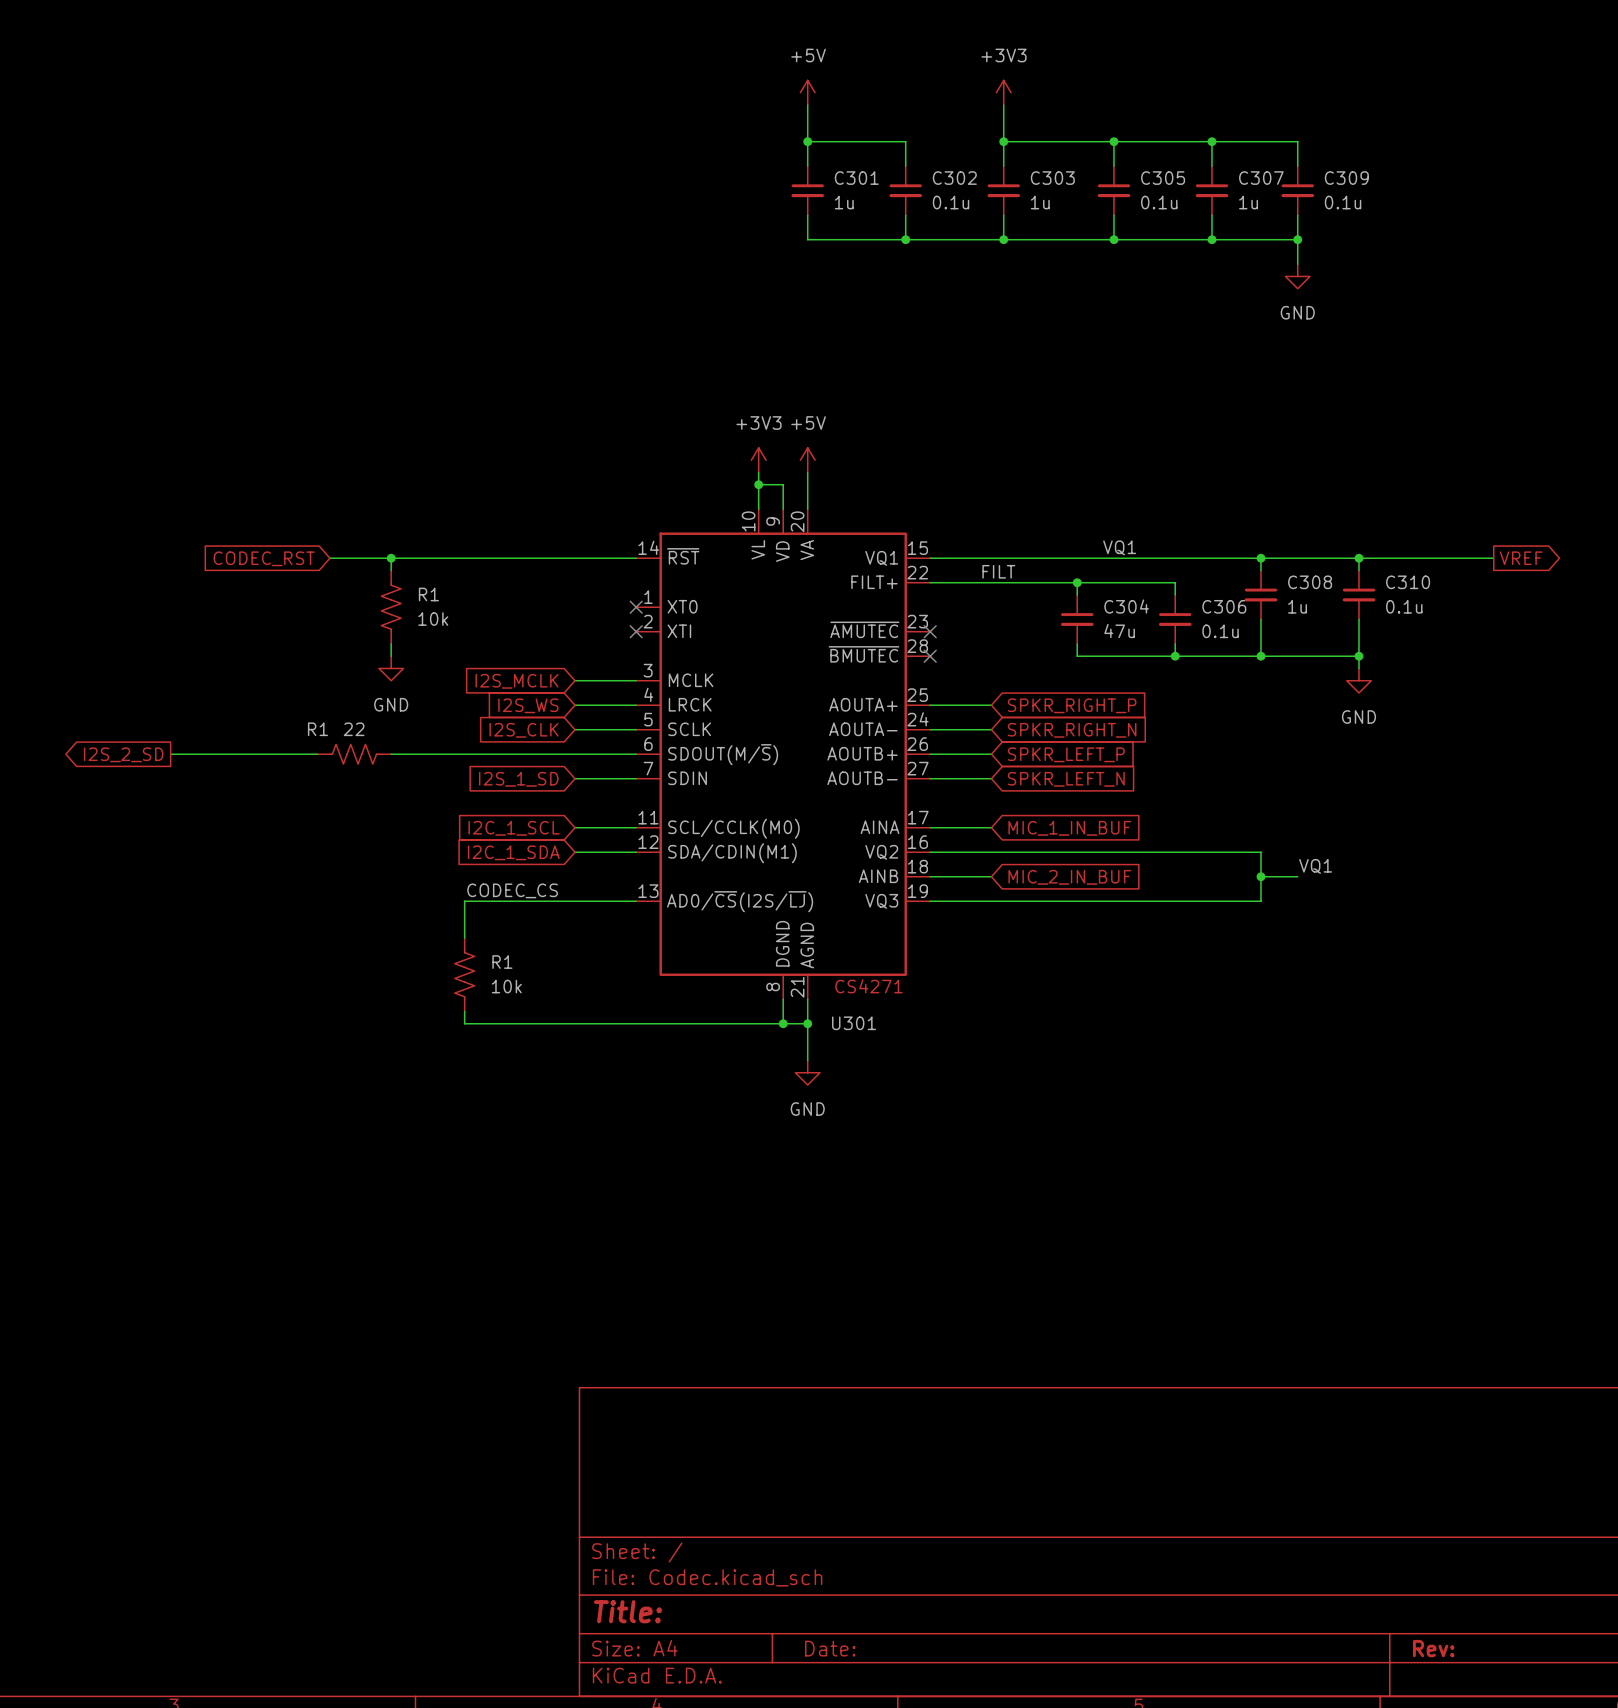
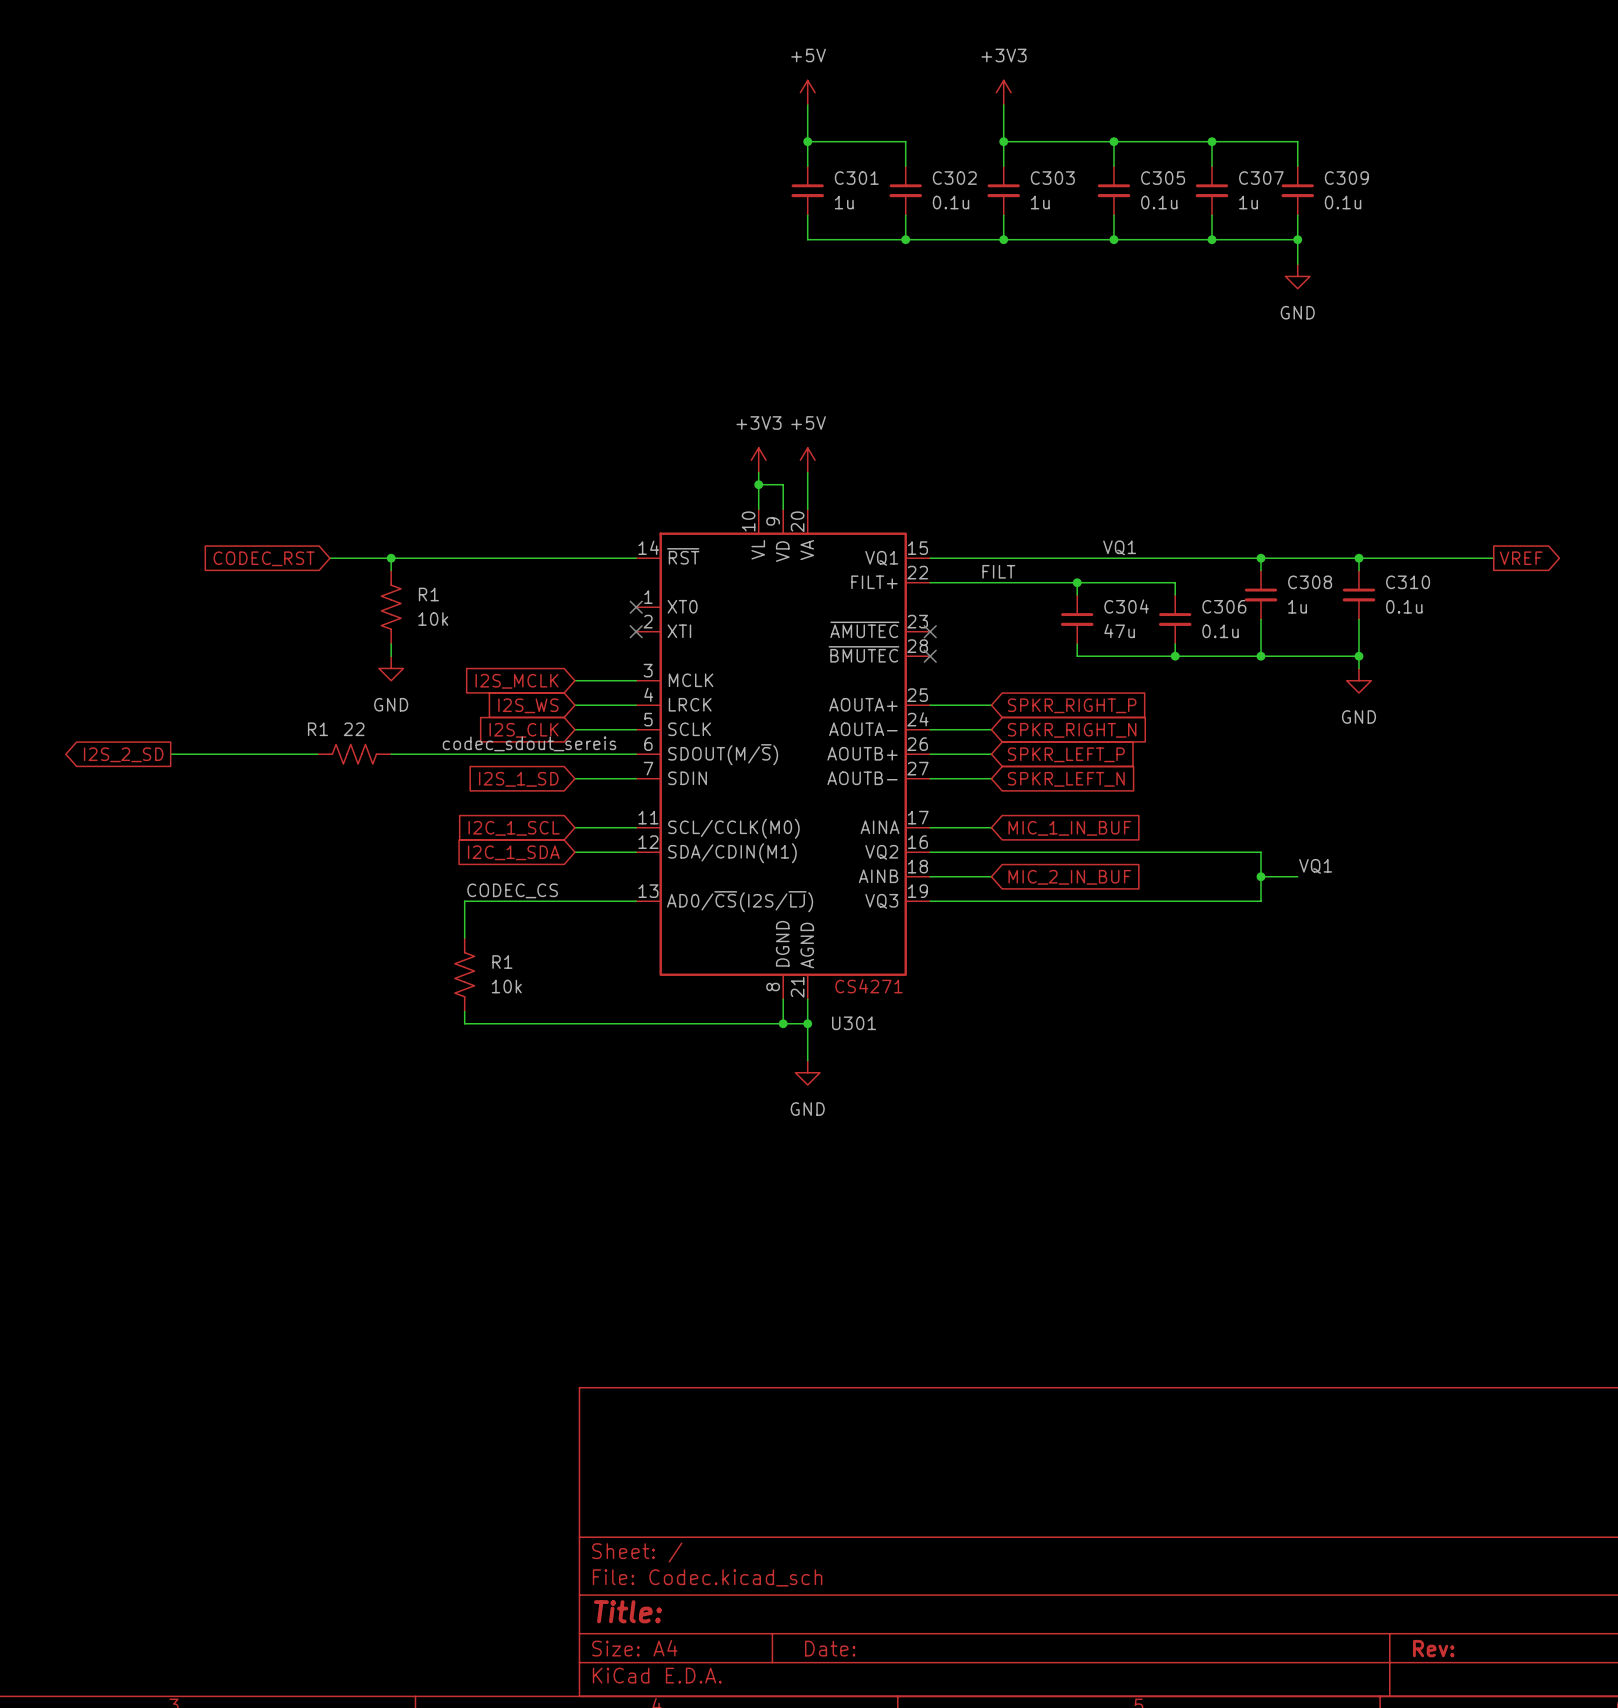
label: none -> codec_sdout_sereis (529, 743)

